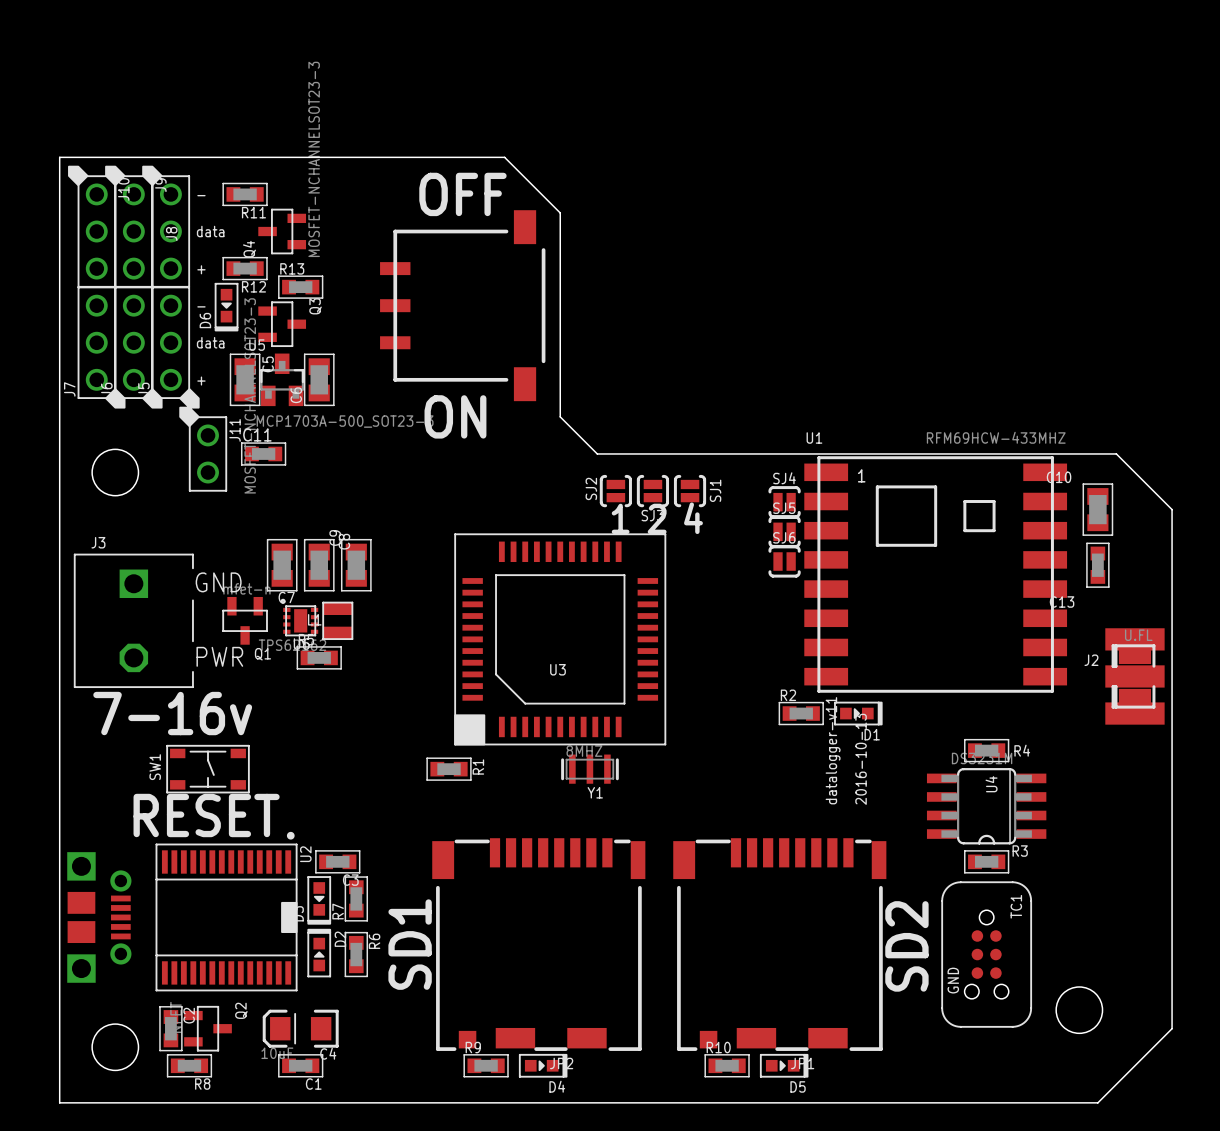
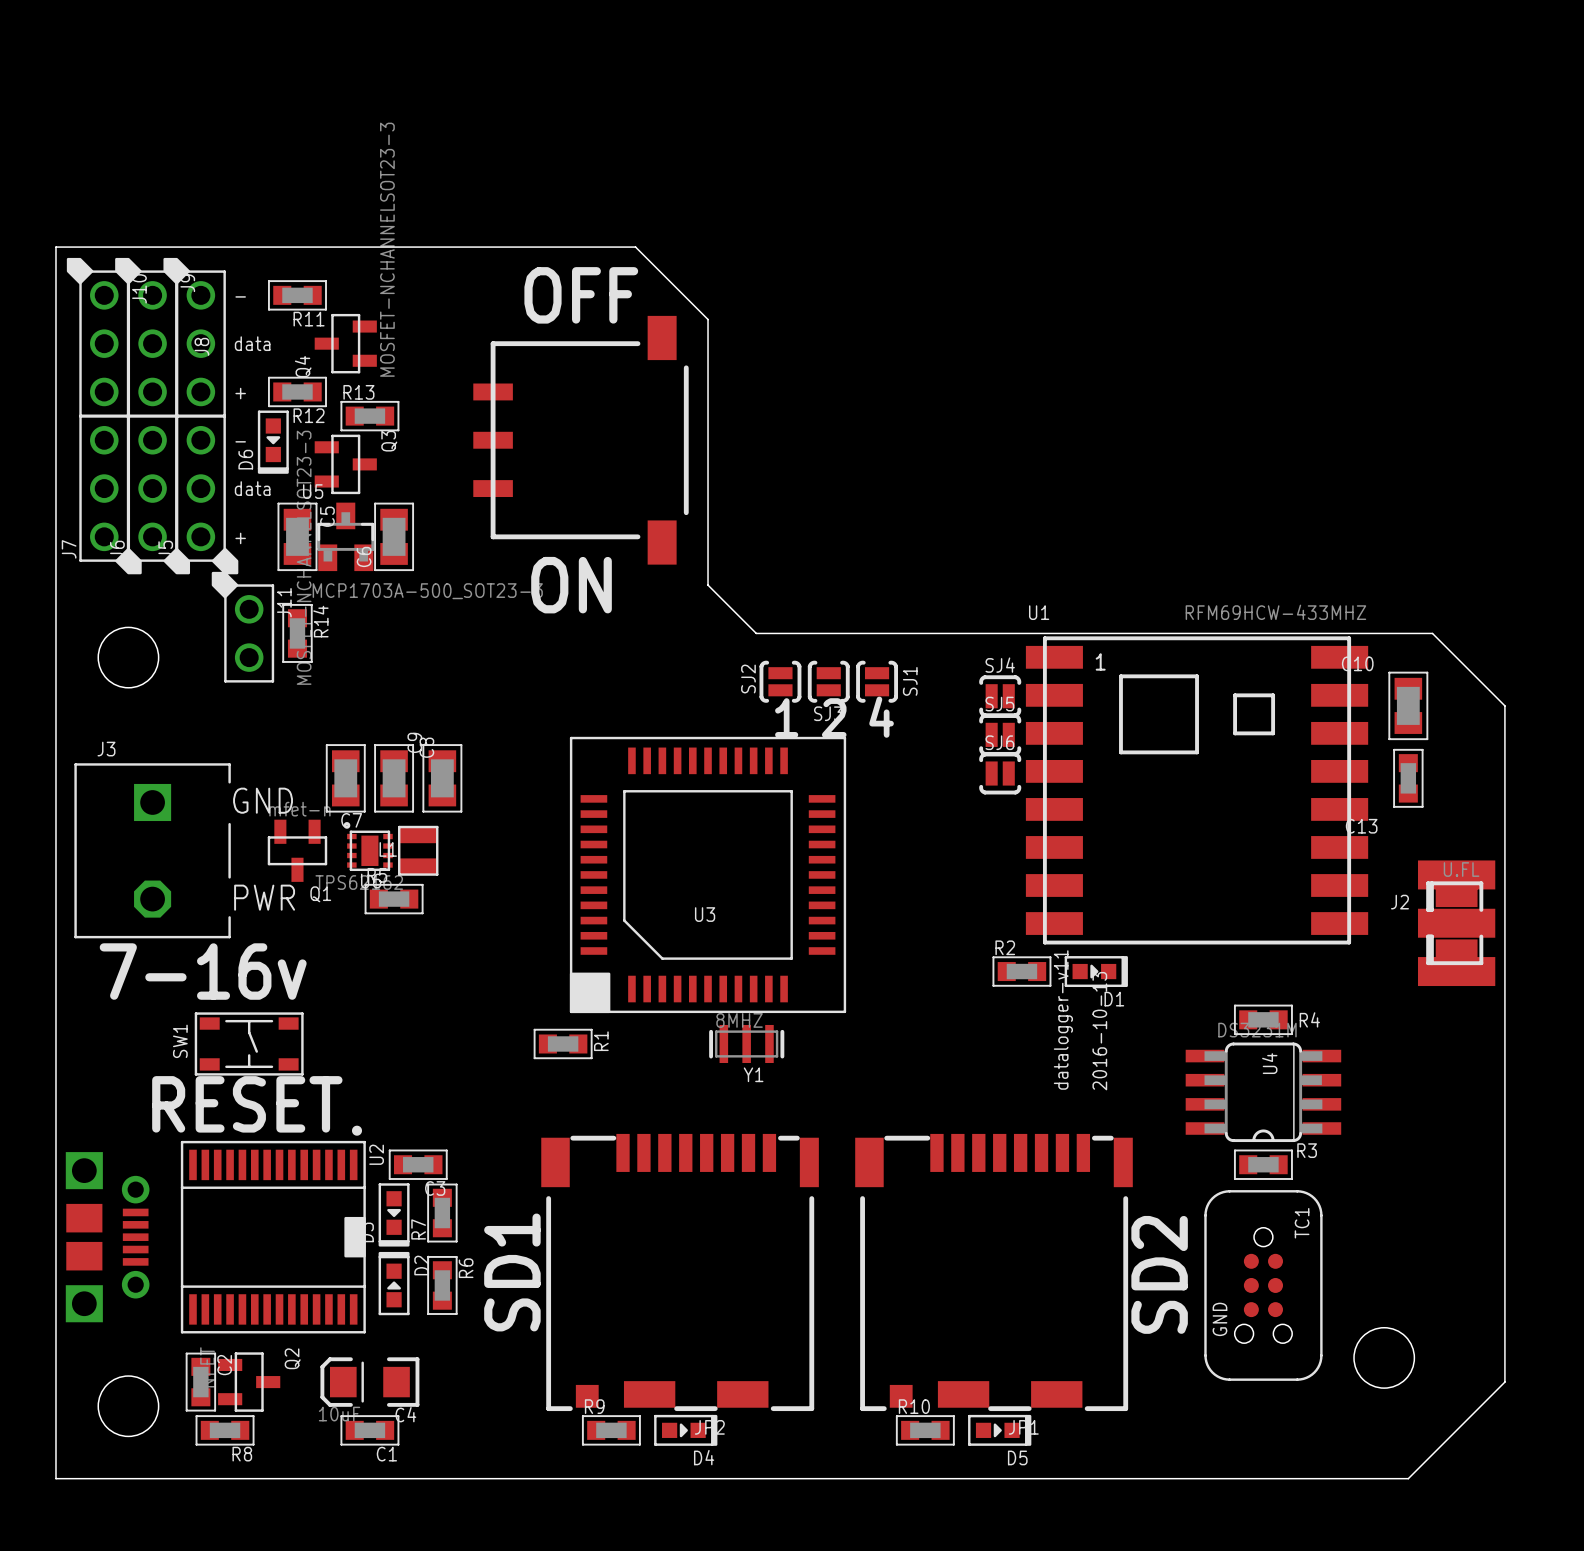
R14: none -> (297, 633)
C11: (263, 453) -> none

